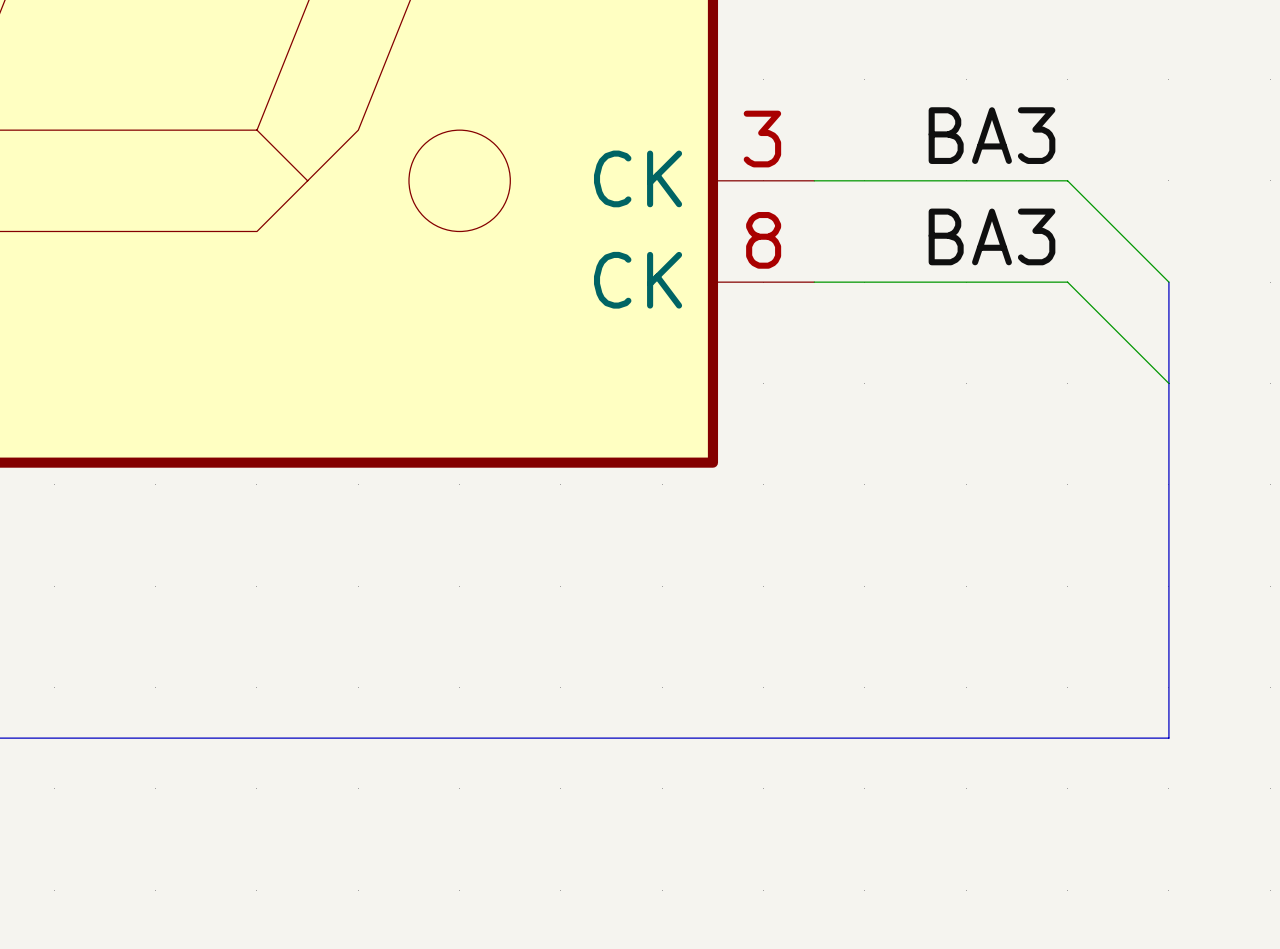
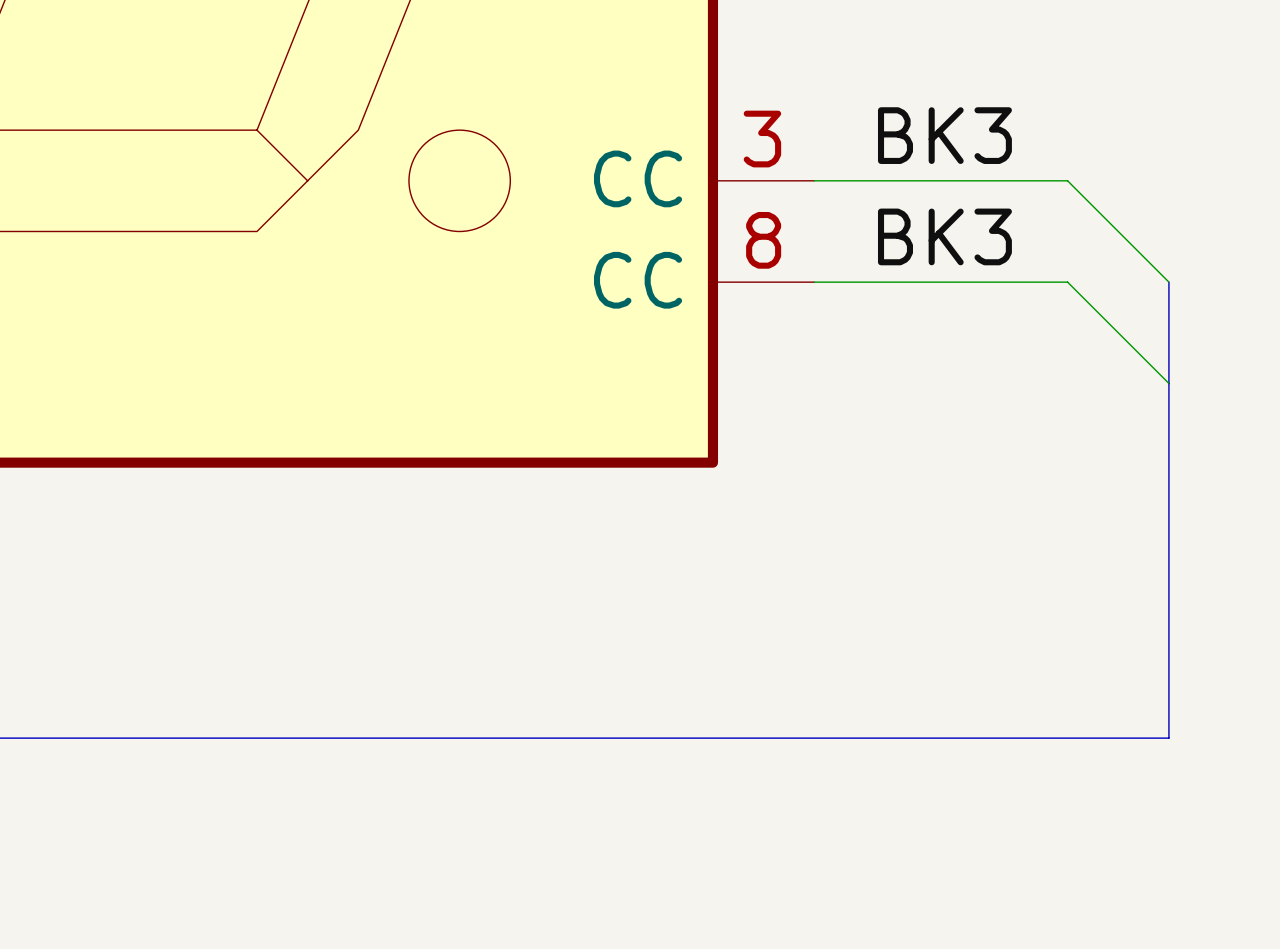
label: BA3 (991, 135) -> BK3 (944, 135)
part pin name: CK (638, 178) -> CC (638, 178)
label: BA3 (991, 236) -> BK3 (944, 236)
part pin name: CK (638, 280) -> CC (638, 280)

